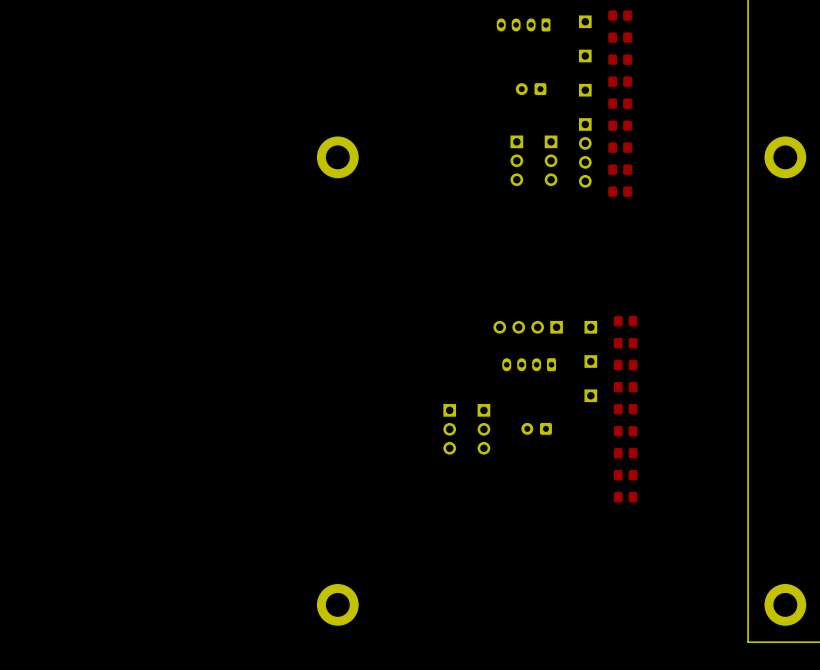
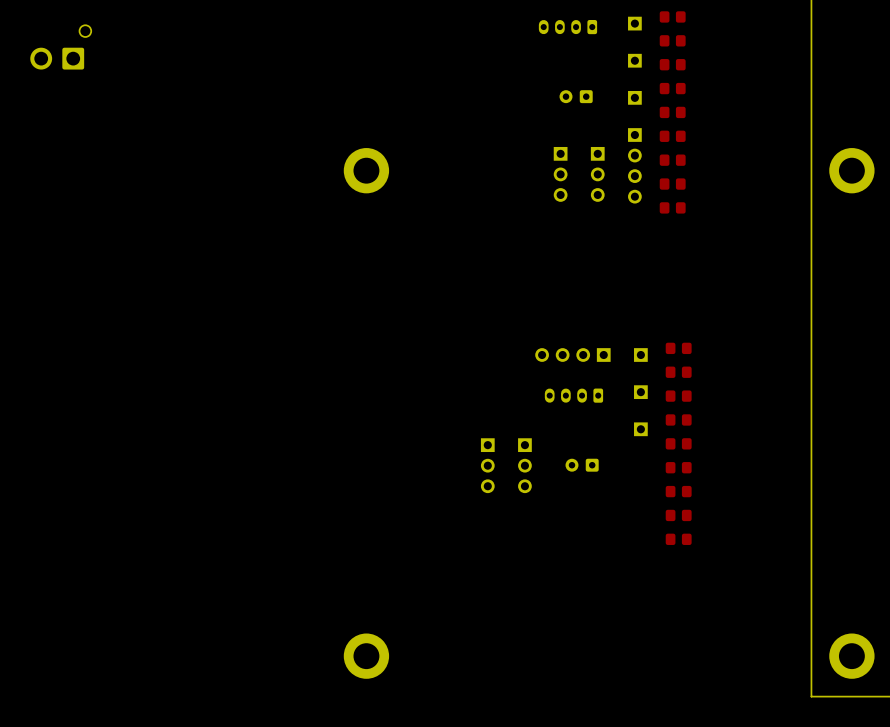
part: none -> (60, 47)

